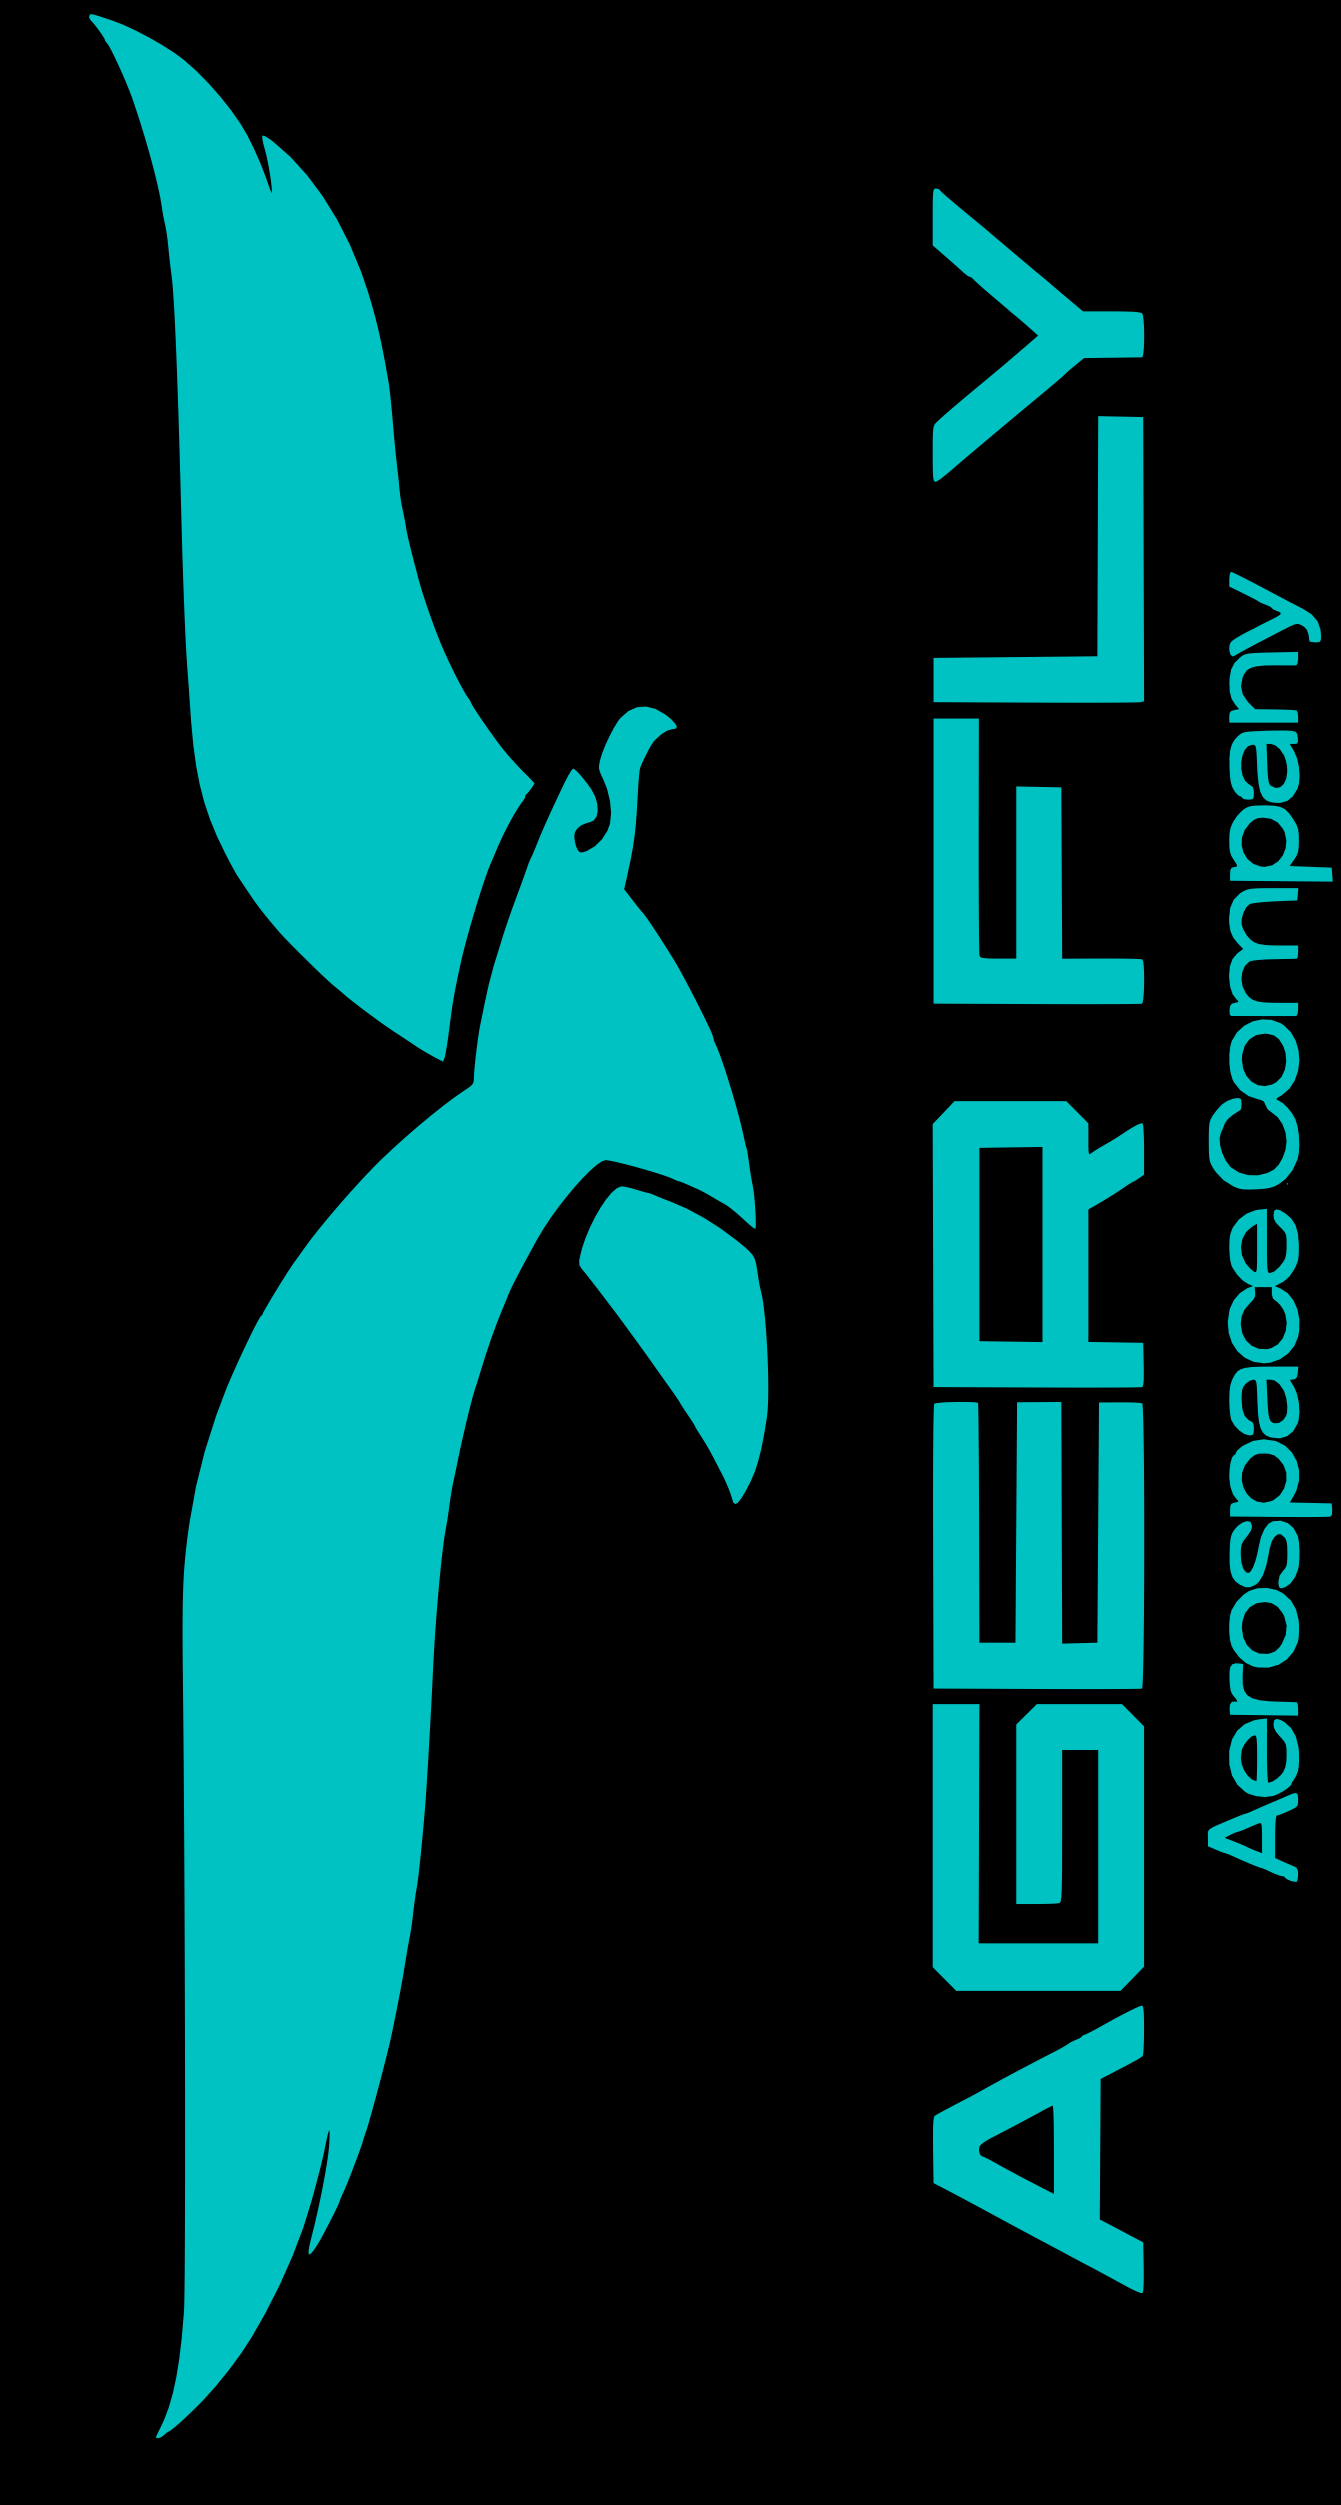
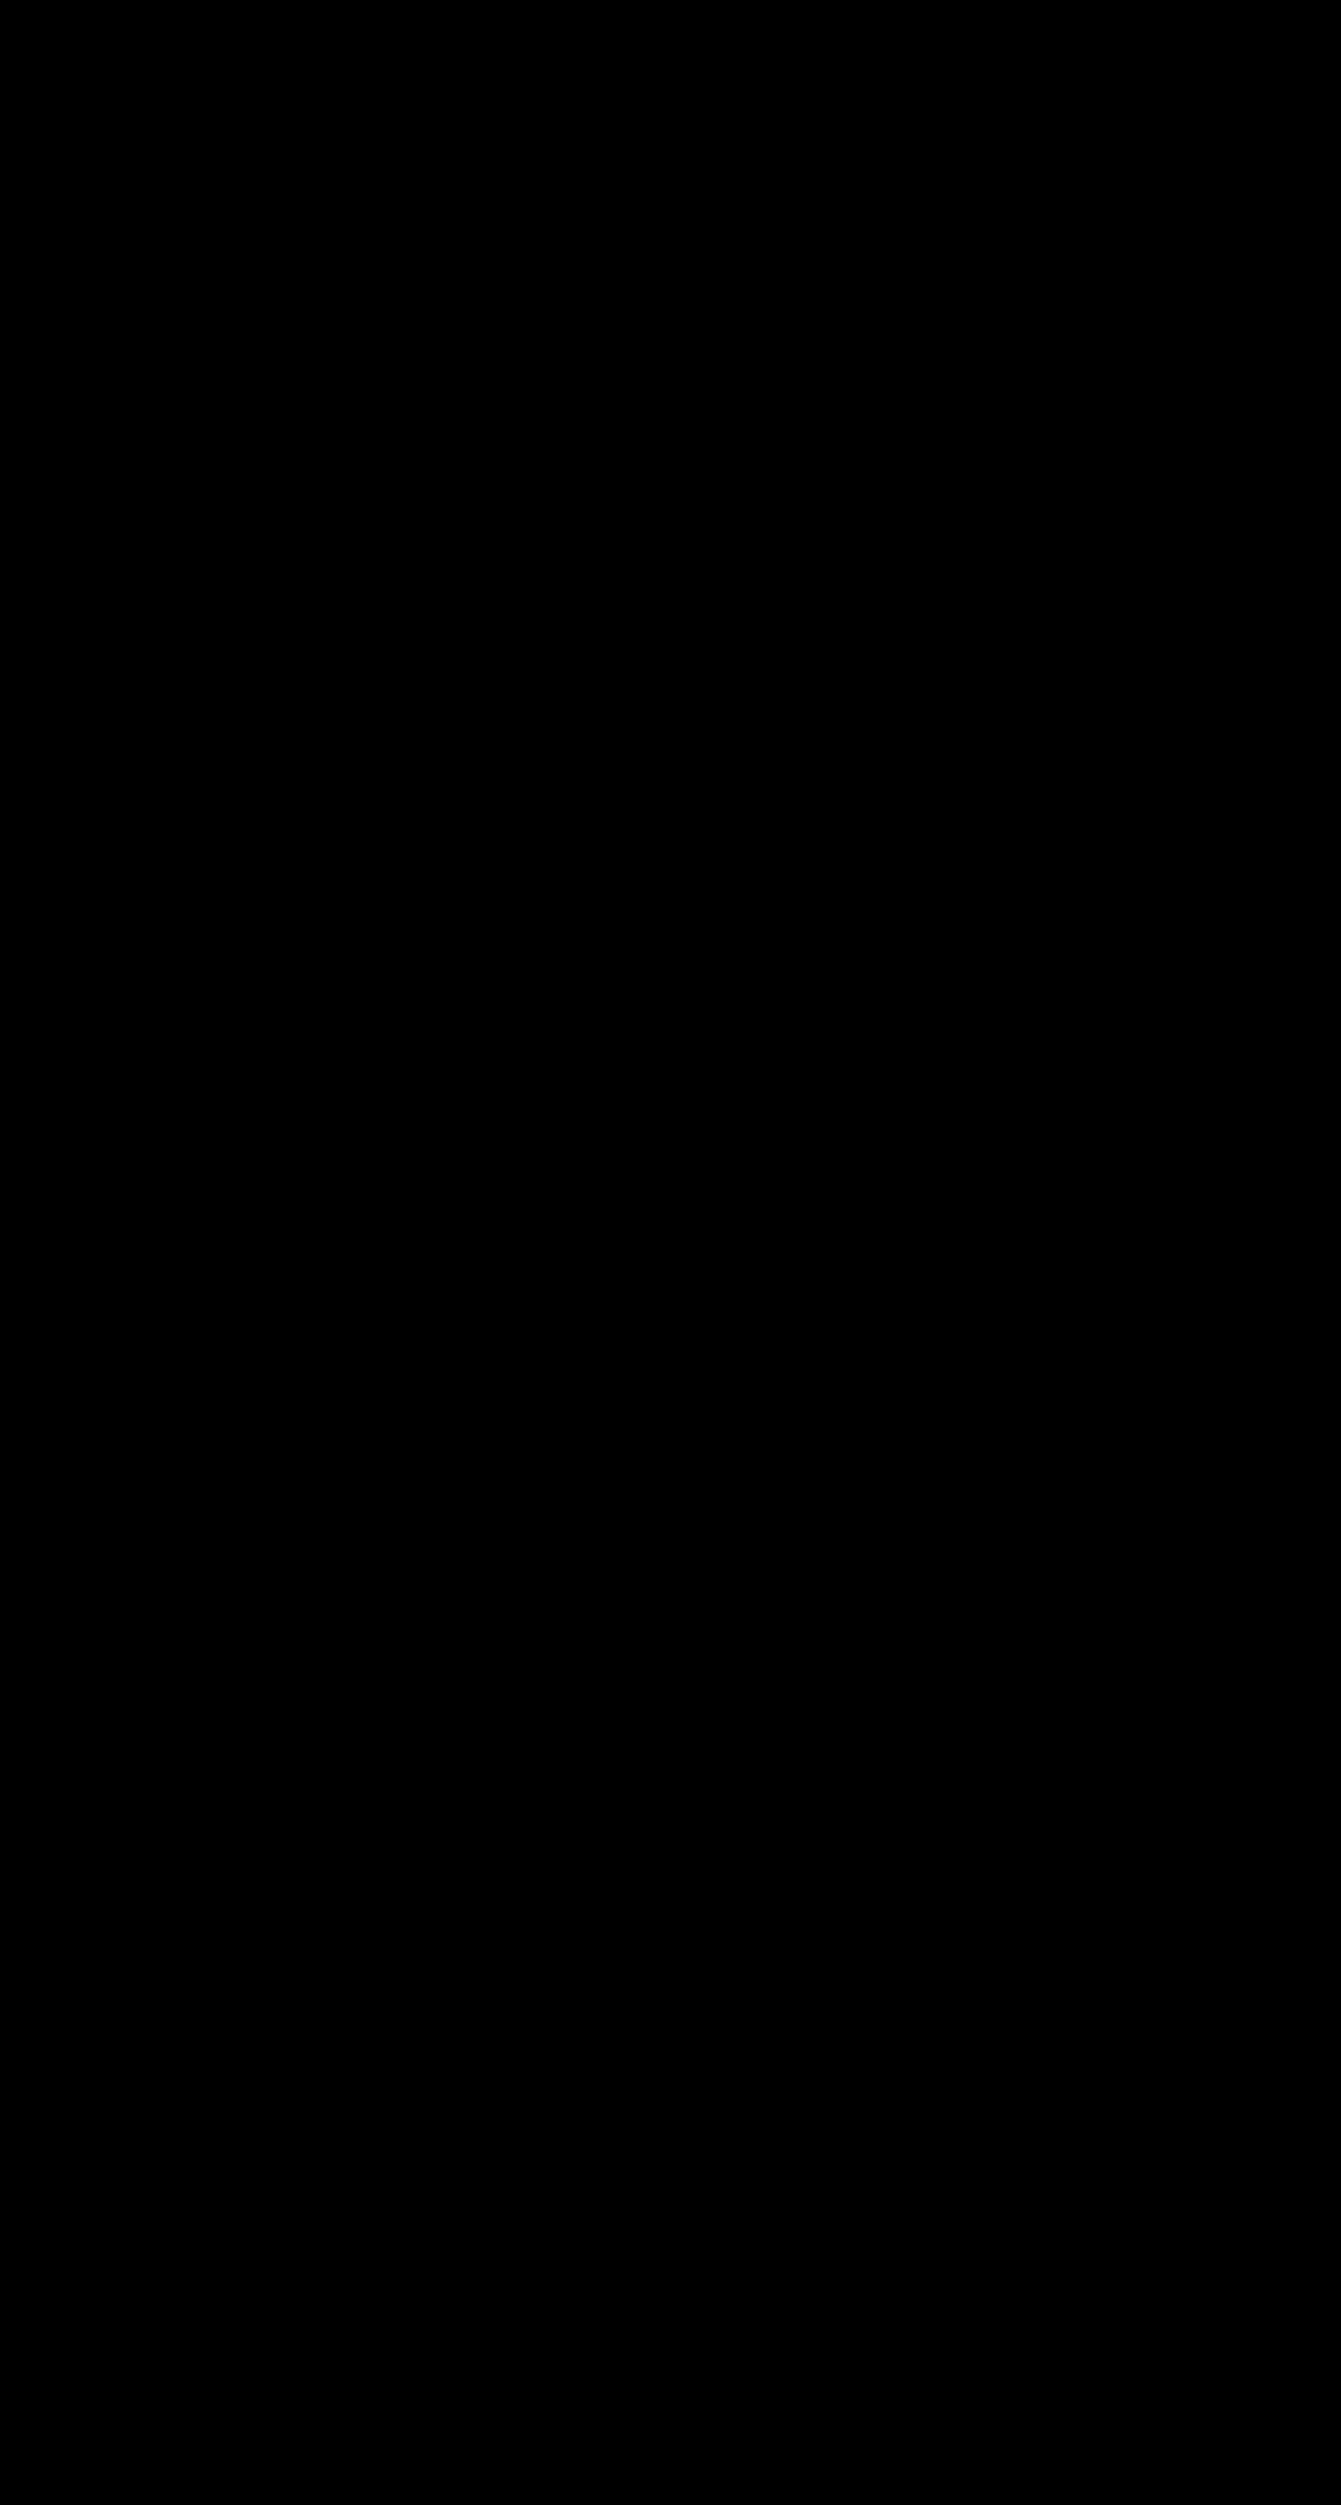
drawing: [89, 14, 1333, 2439] -> none

